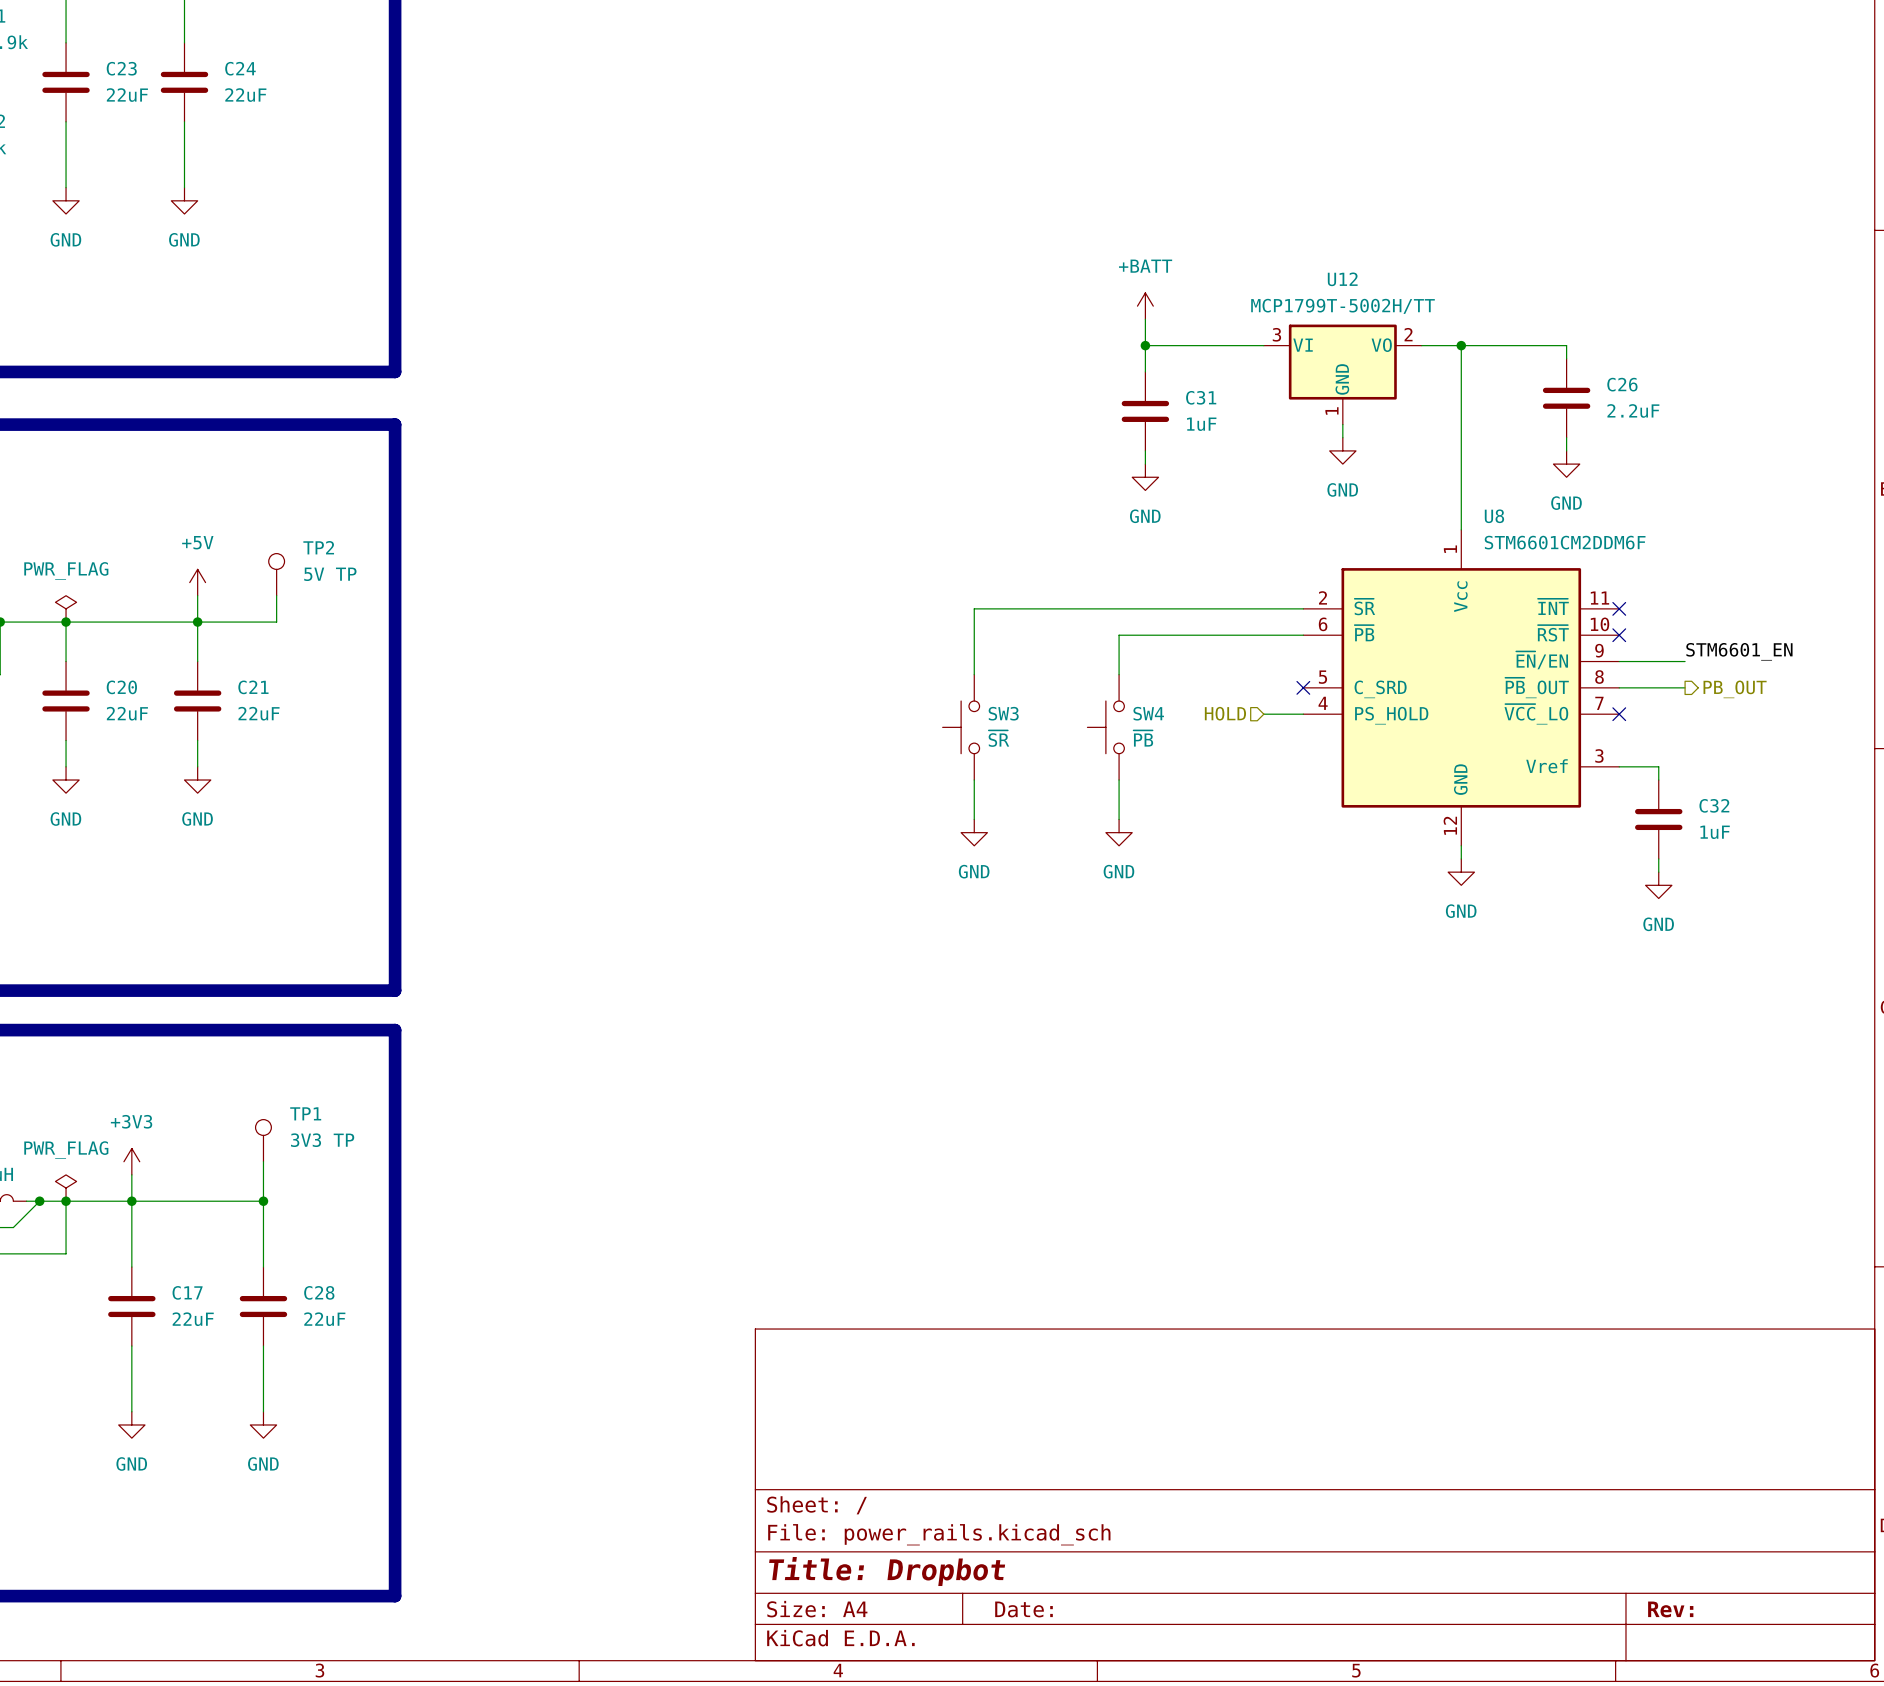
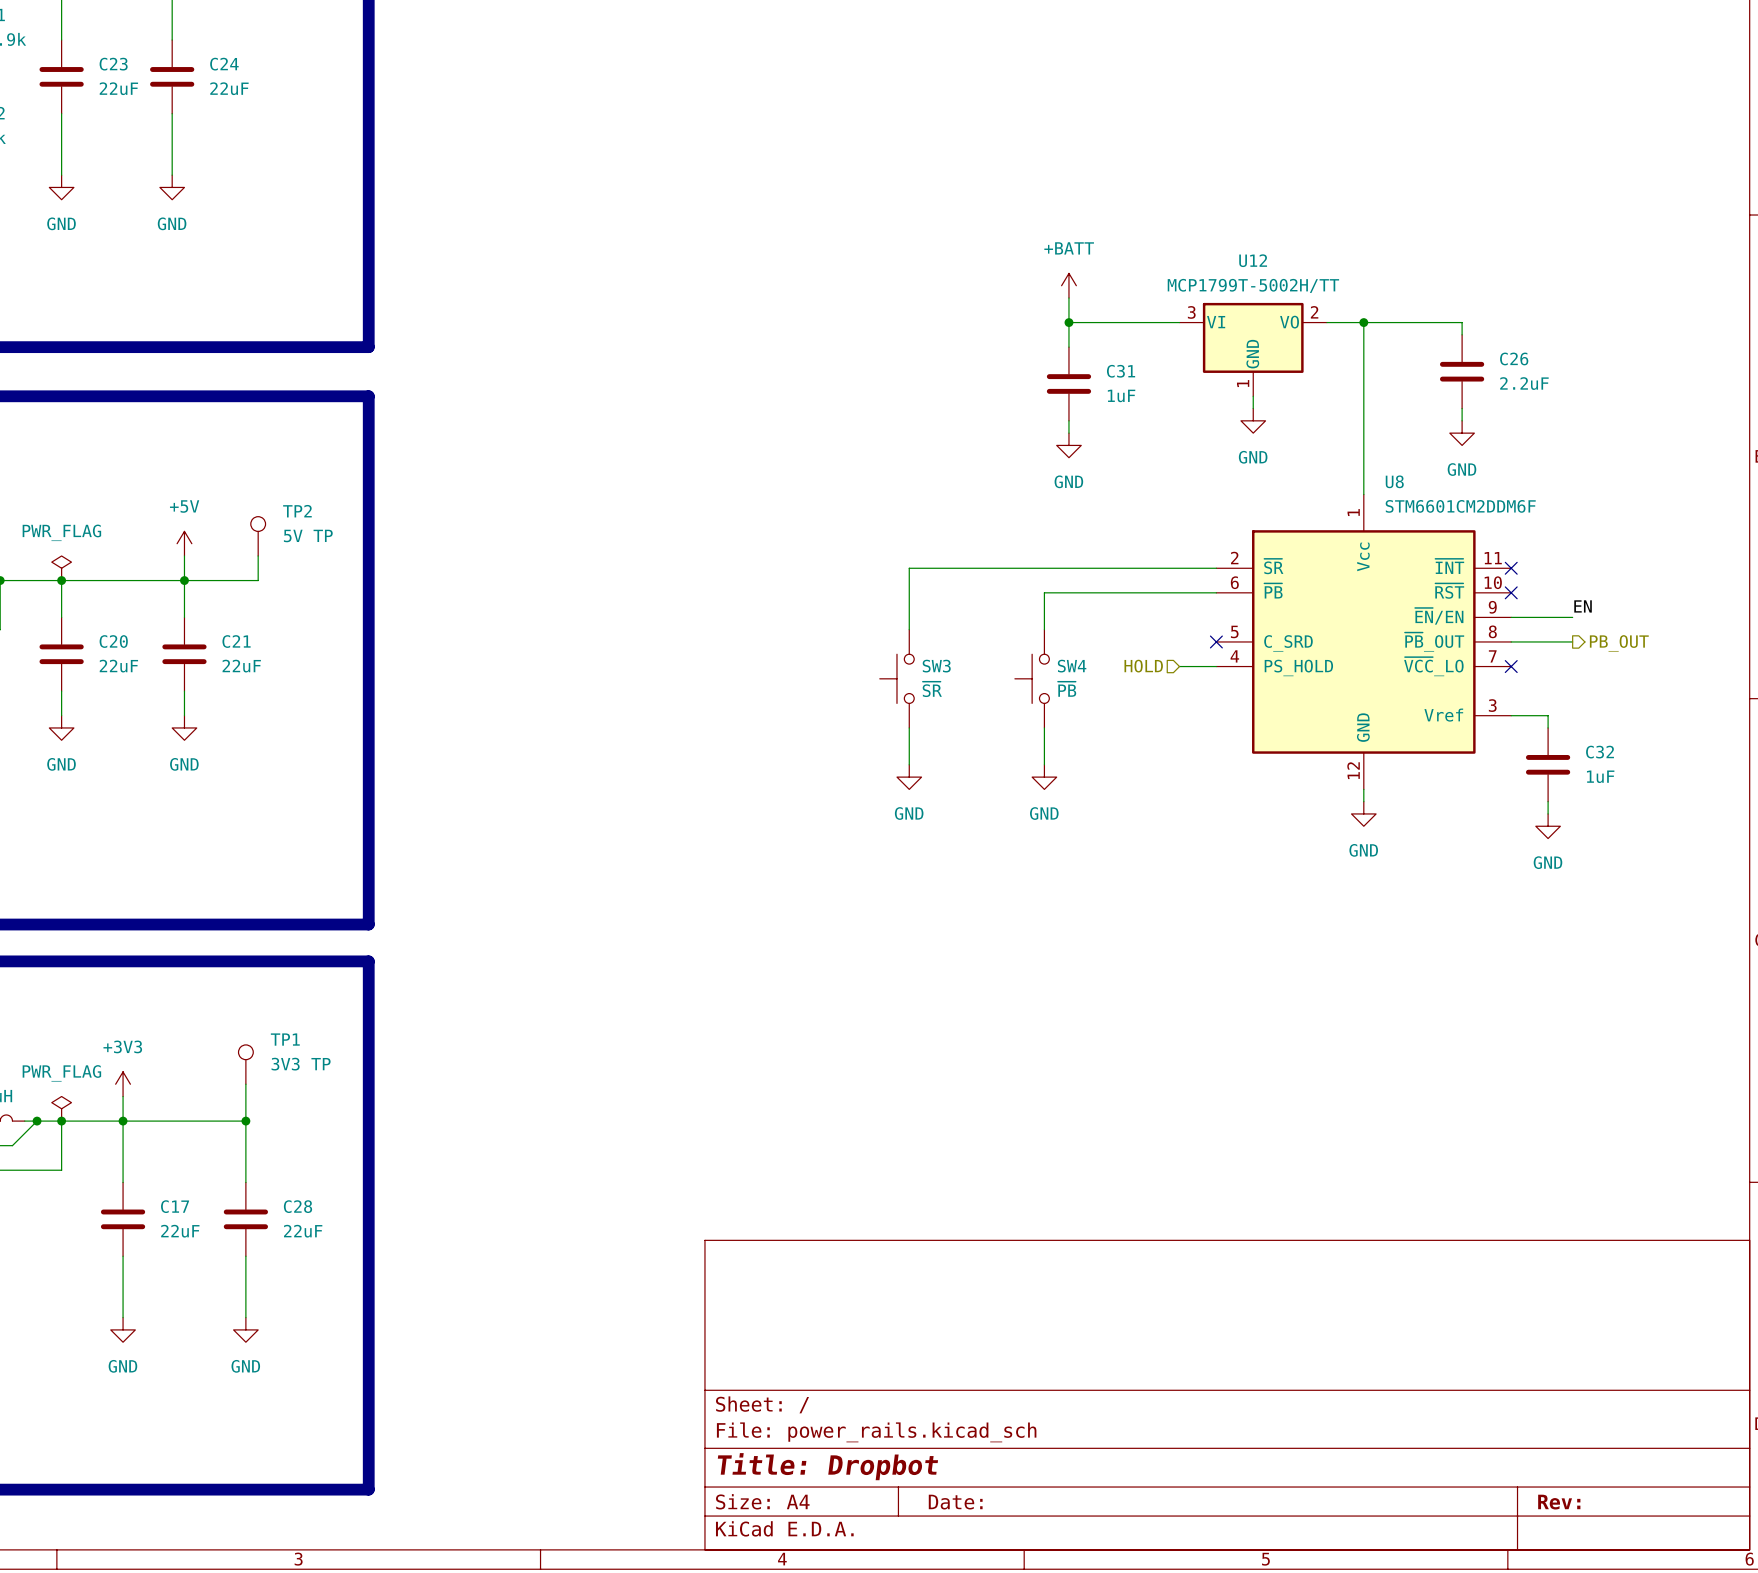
label: STM6601_EN (1739, 651) -> EN (1583, 606)

